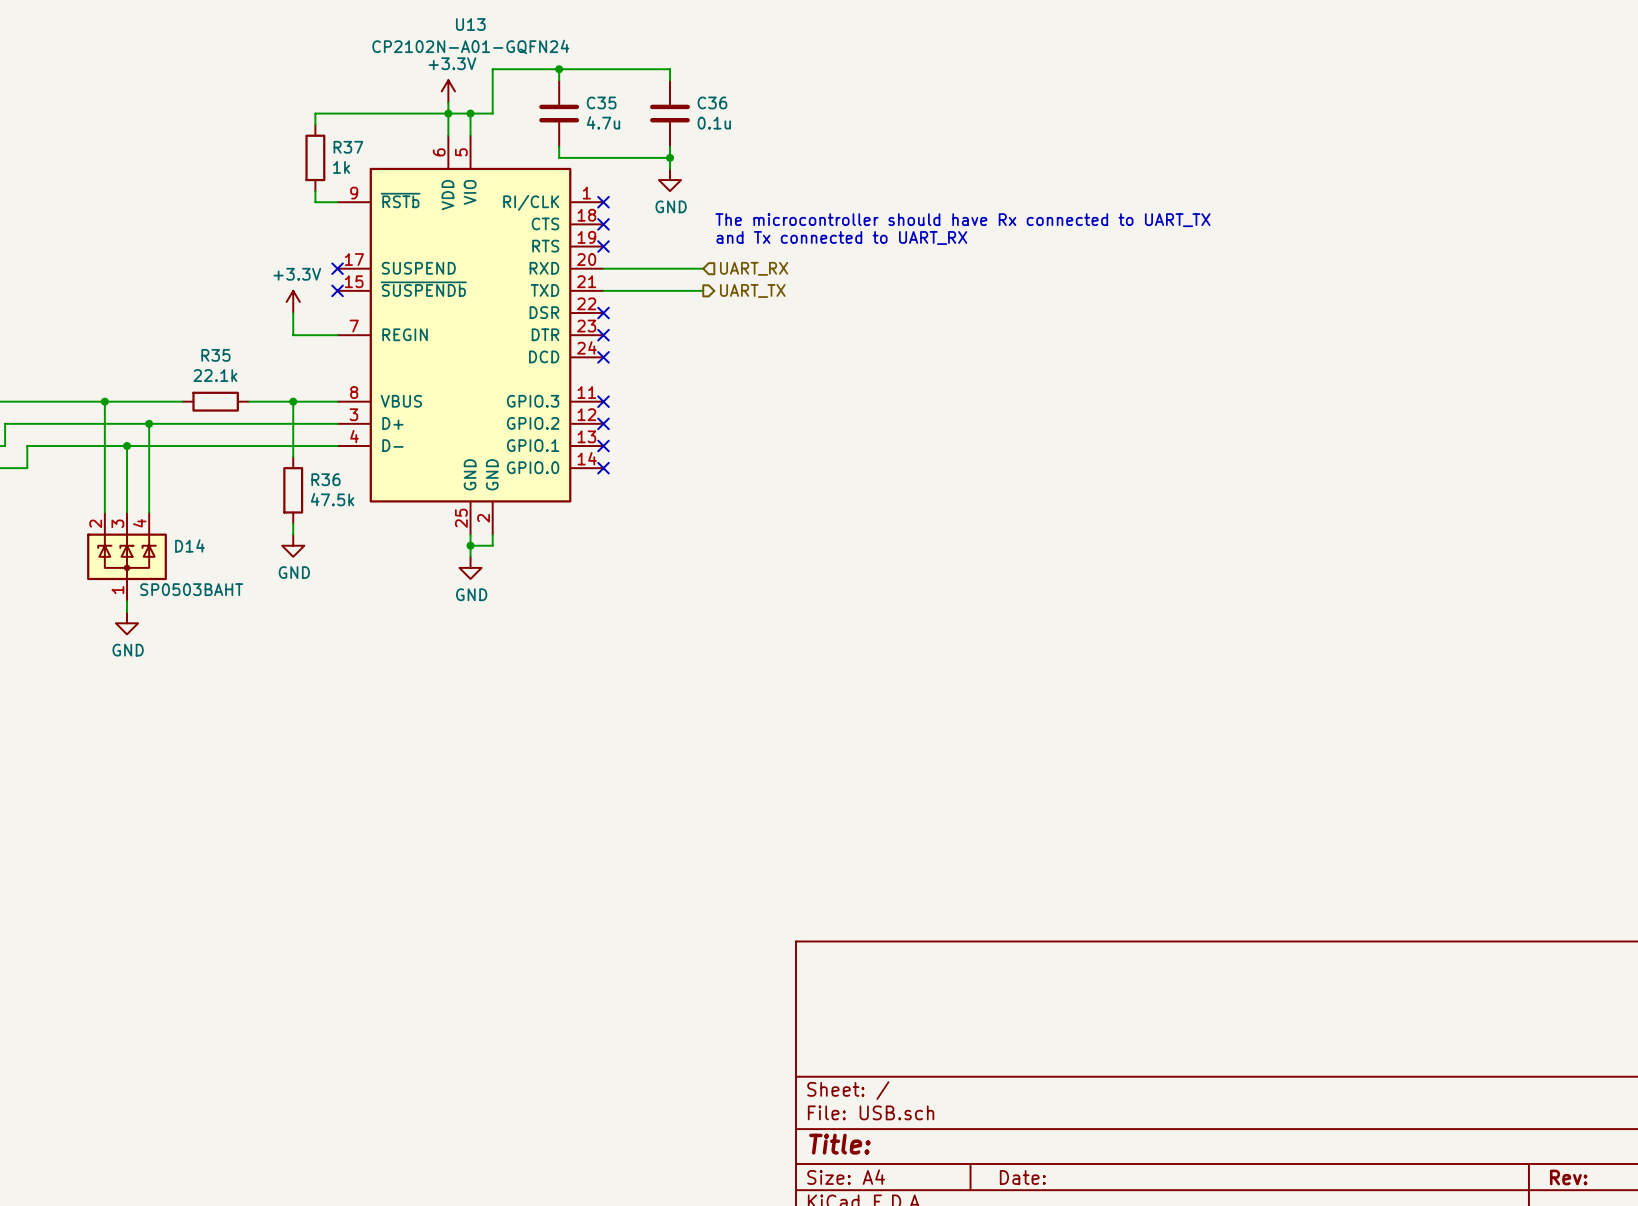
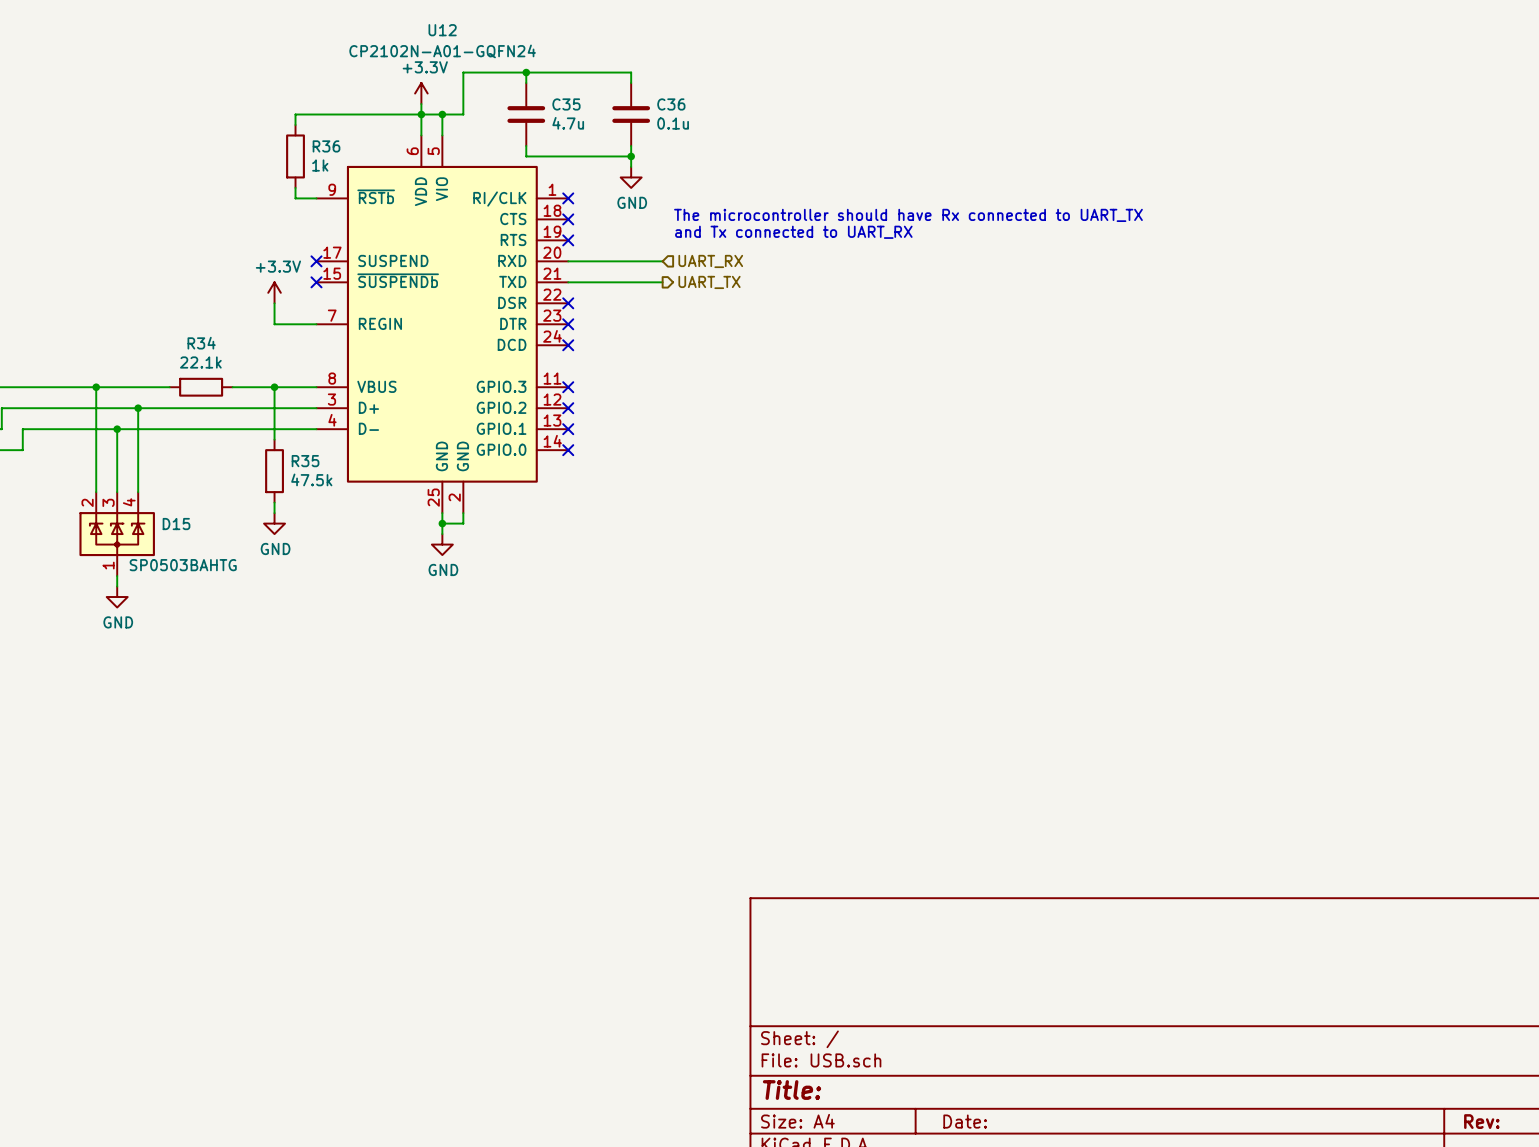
U13 name: U13 (470, 24) -> U12 (442, 30)
R37 name: R37 (348, 147) -> R36 (326, 146)
R35 name: R35 (215, 355) -> R34 (201, 343)
R36 name: R36 (325, 479) -> R35 (305, 461)
D14 name: D14 (189, 545) -> D15 (176, 524)
D14 value: SP0503BAHT (191, 589) -> SP0503BAHTG (183, 565)

